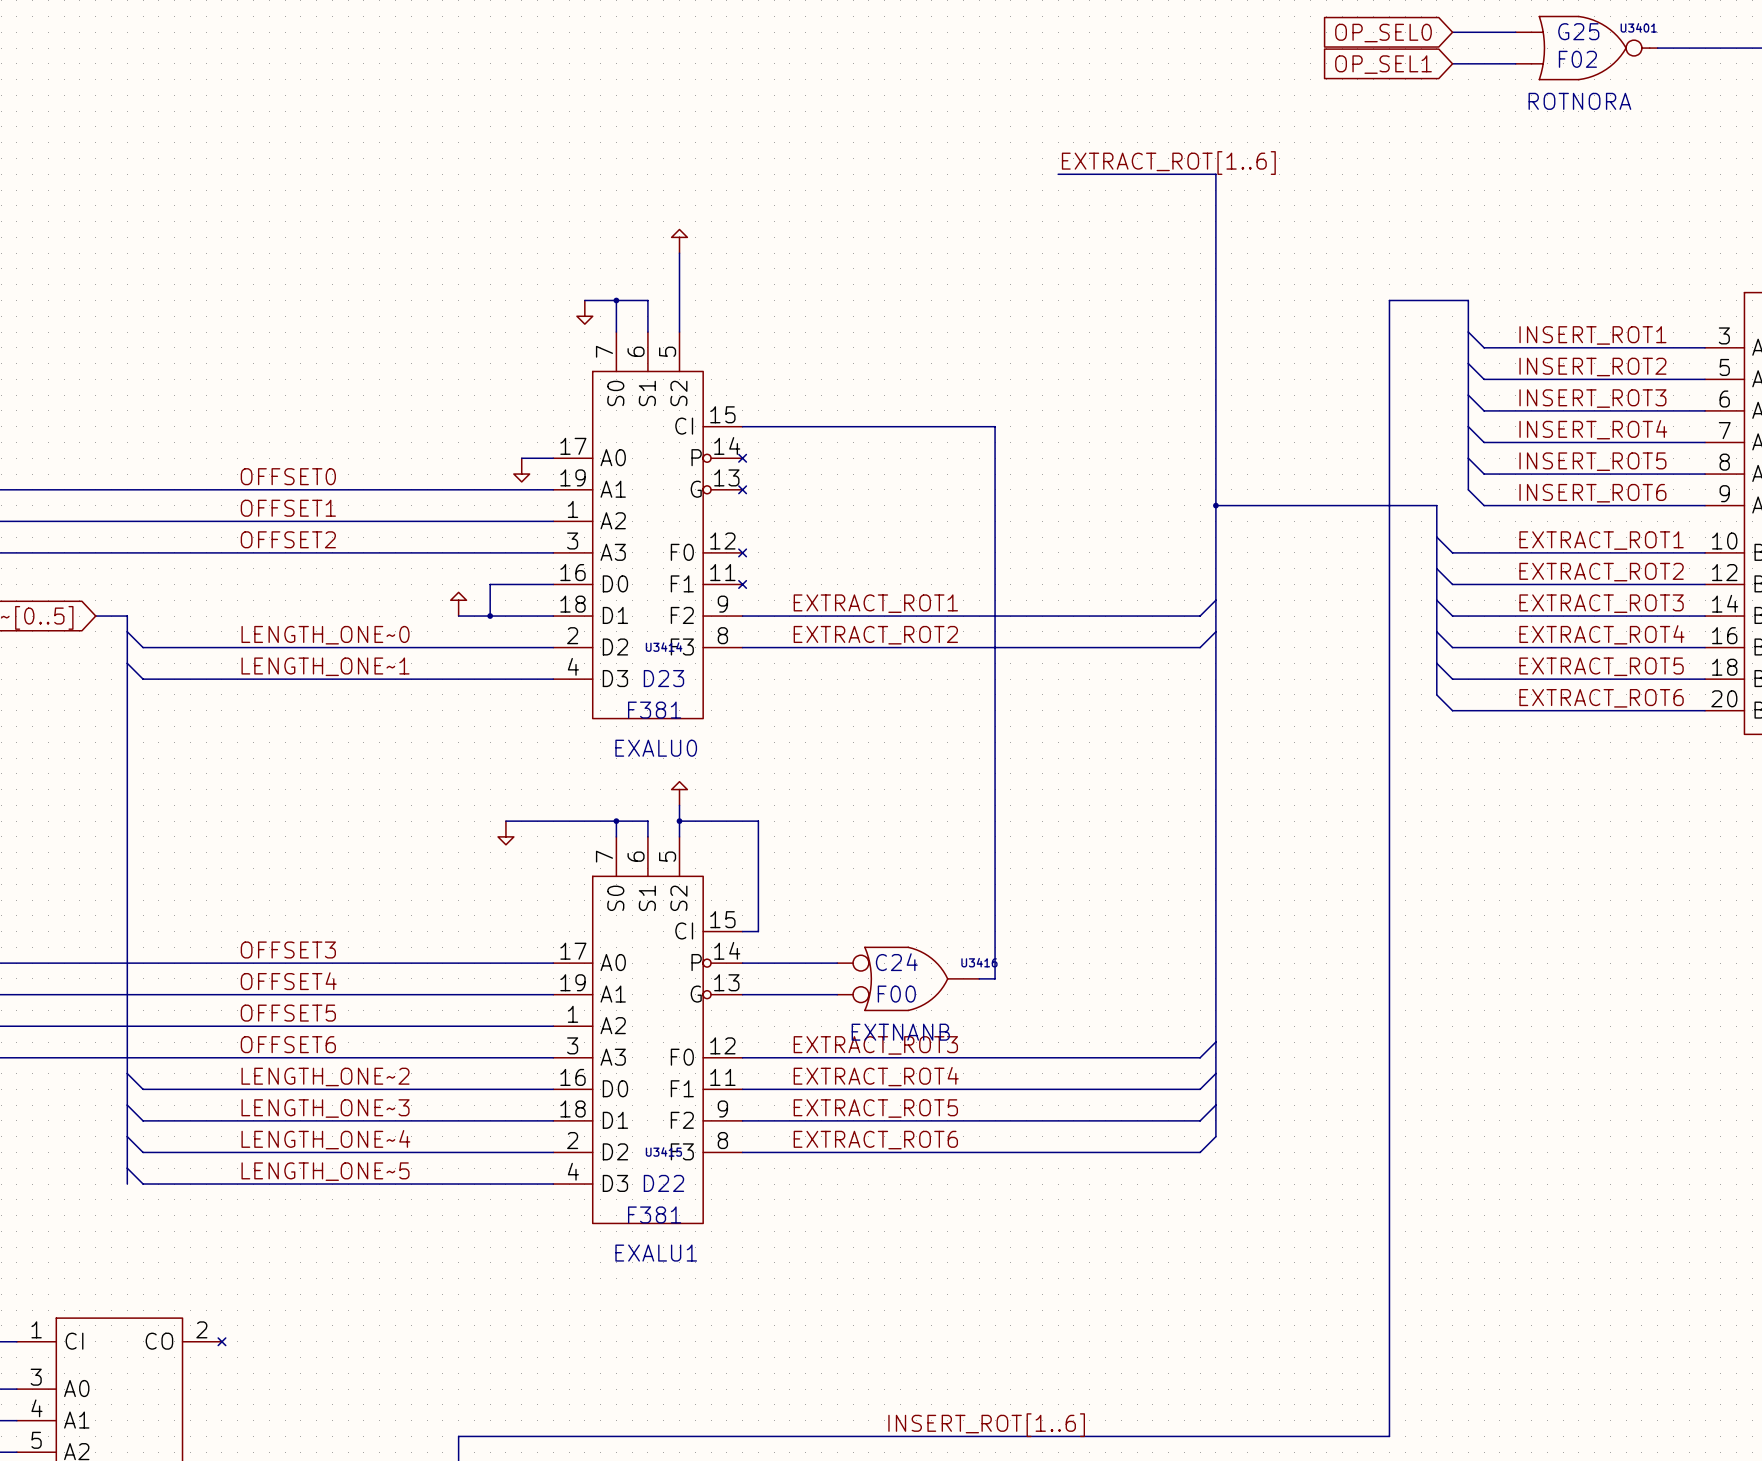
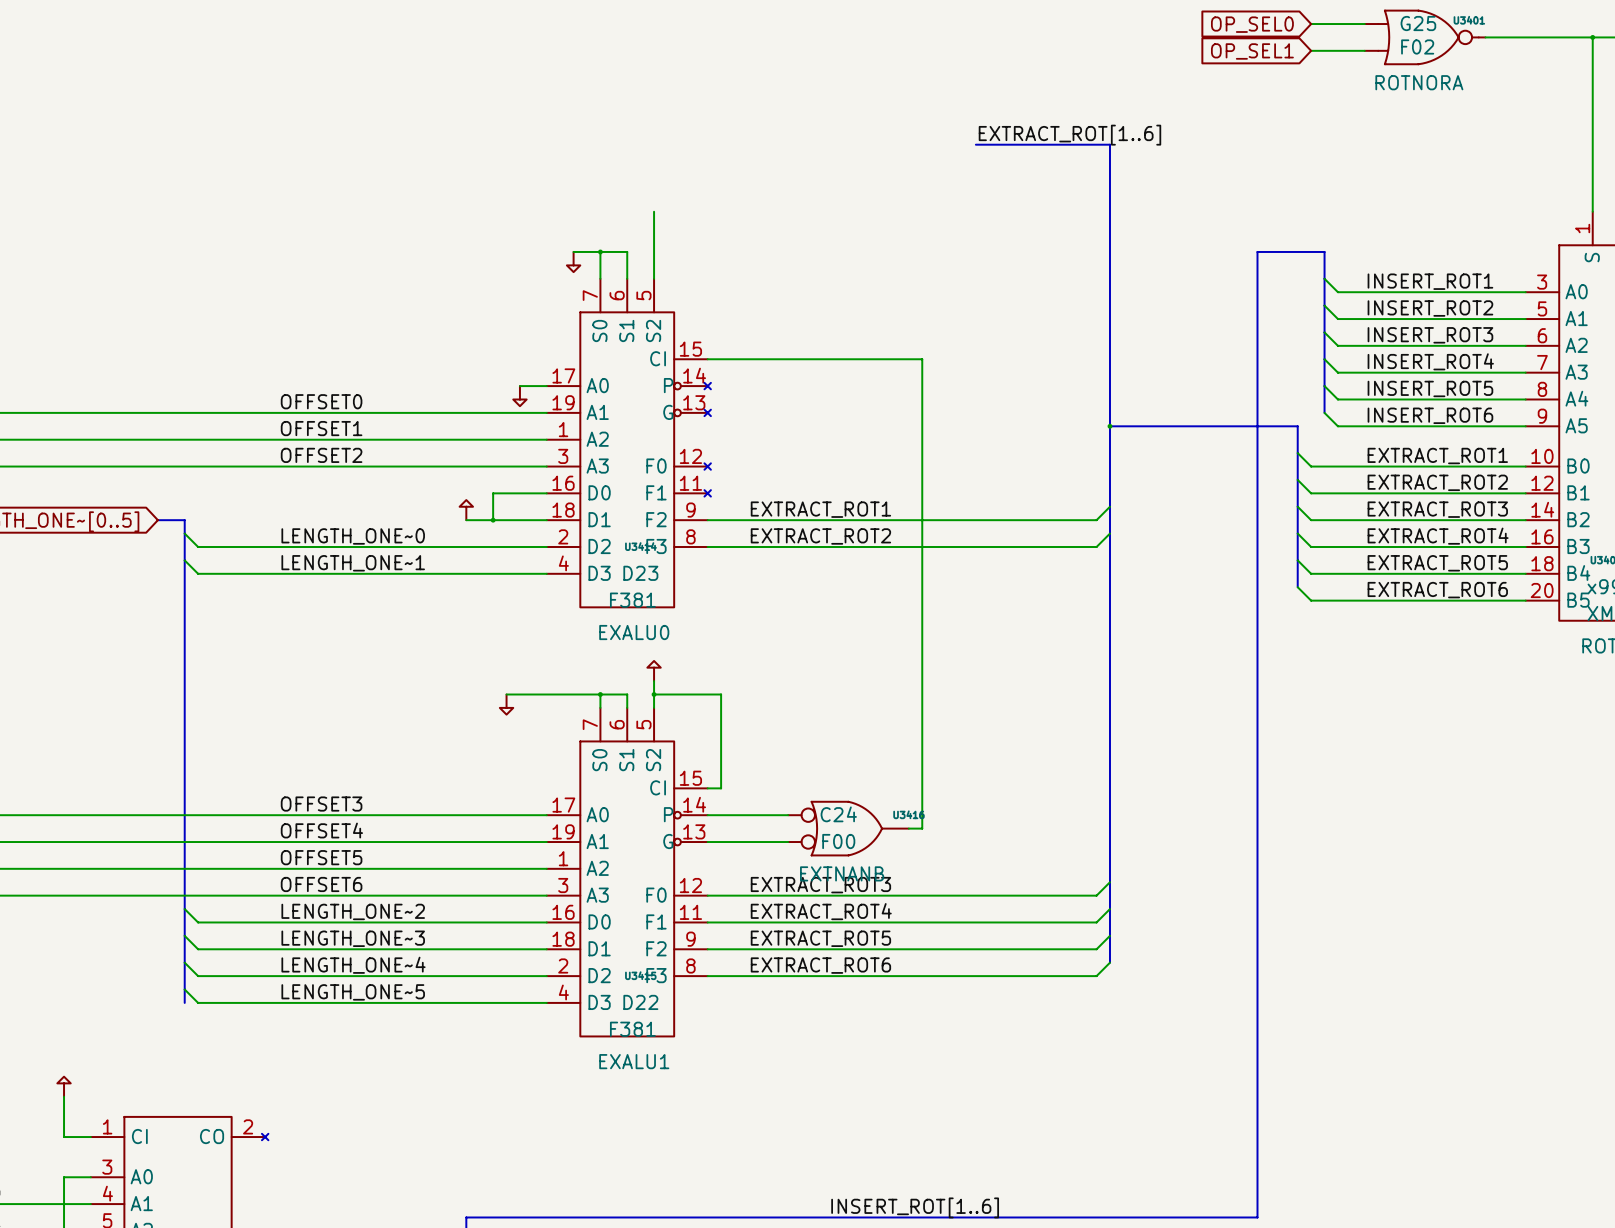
power symbol: (679, 241) -> none

